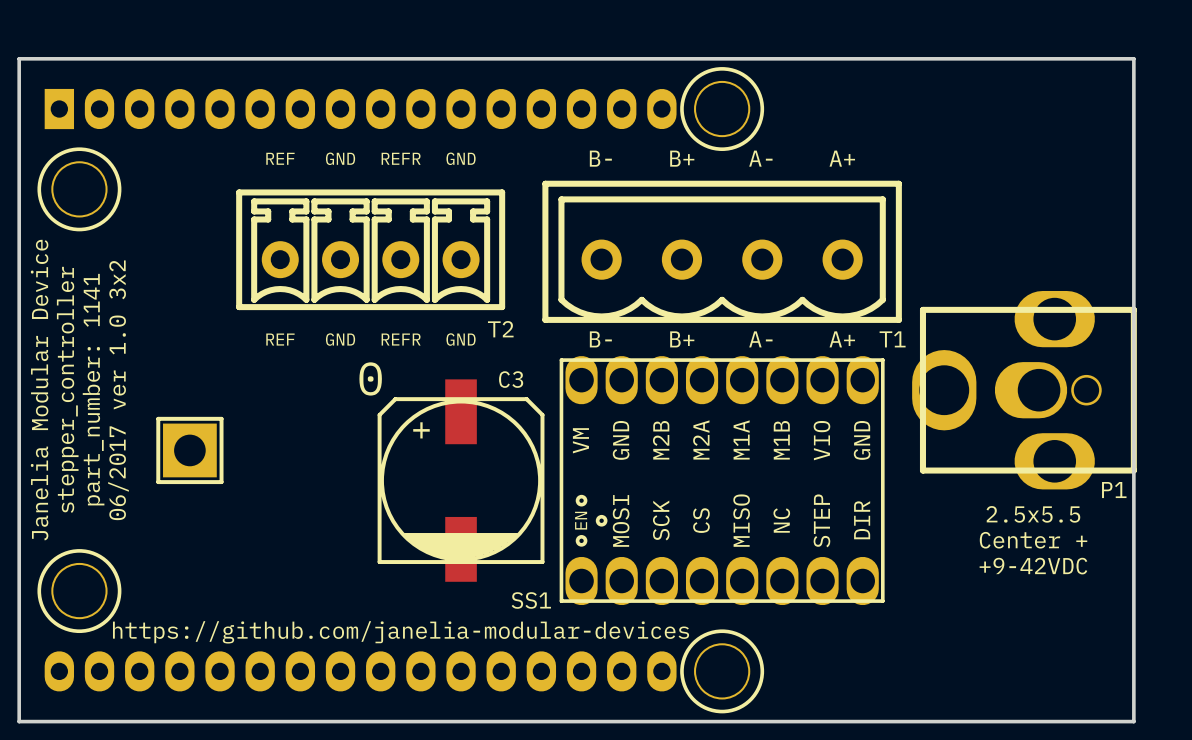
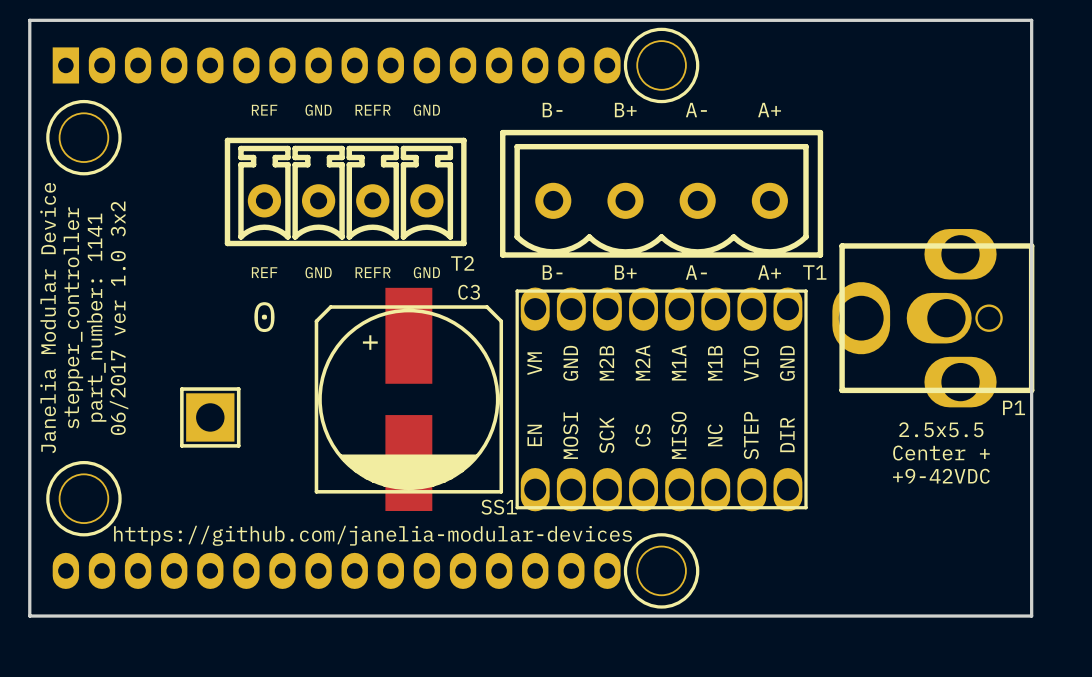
SS1 footprint: [559, 356, 885, 606] -> [515, 287, 808, 512]
text position: 0 (370, 378) -> 0 (264, 317)
C3 footprint: [377, 379, 545, 582] -> [314, 287, 504, 511]
part position: (189, 450) -> (210, 417)

